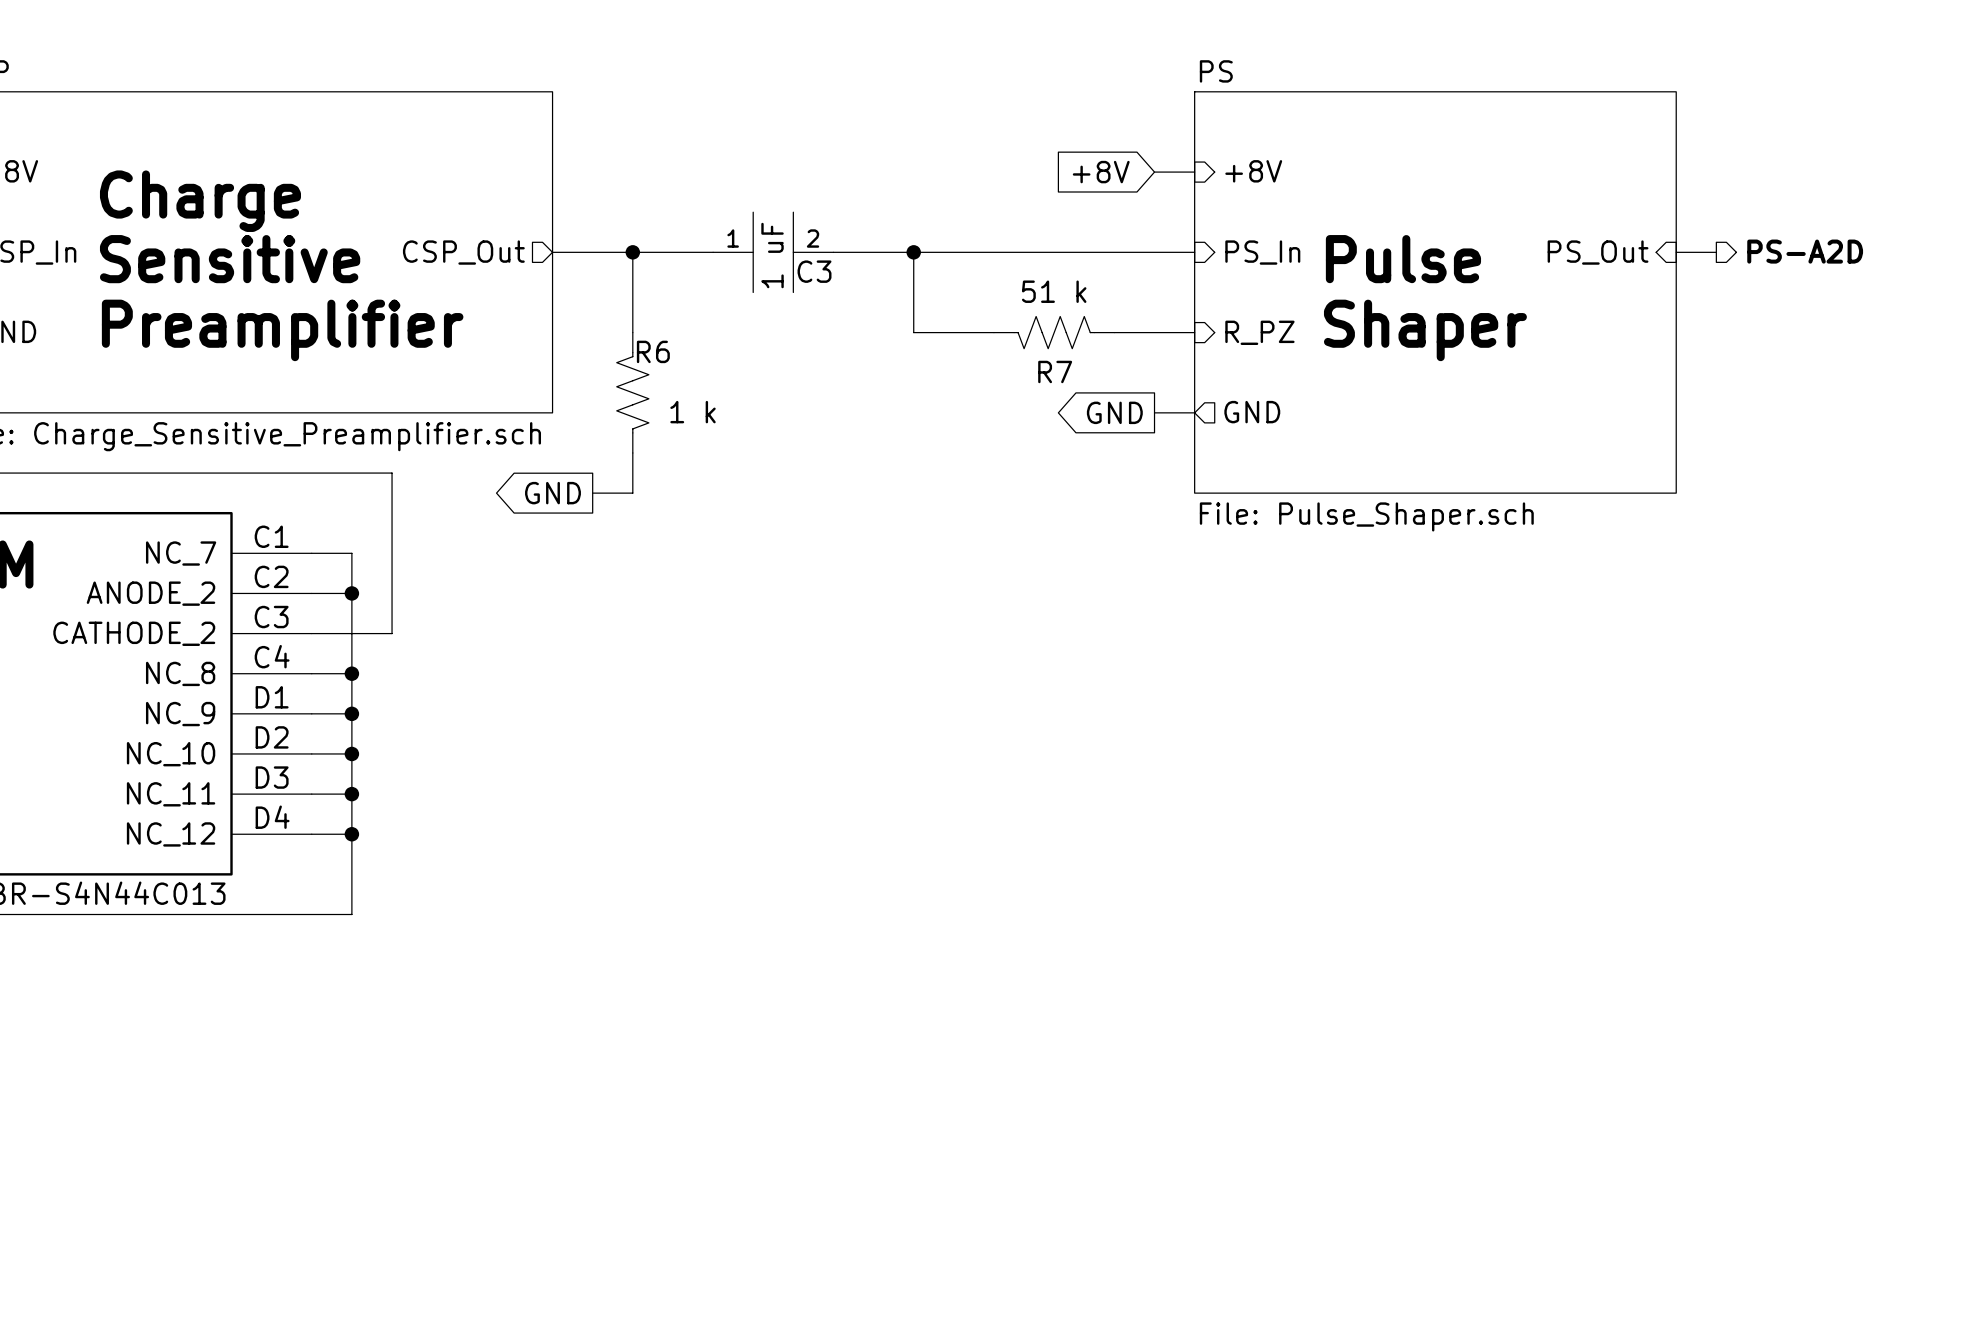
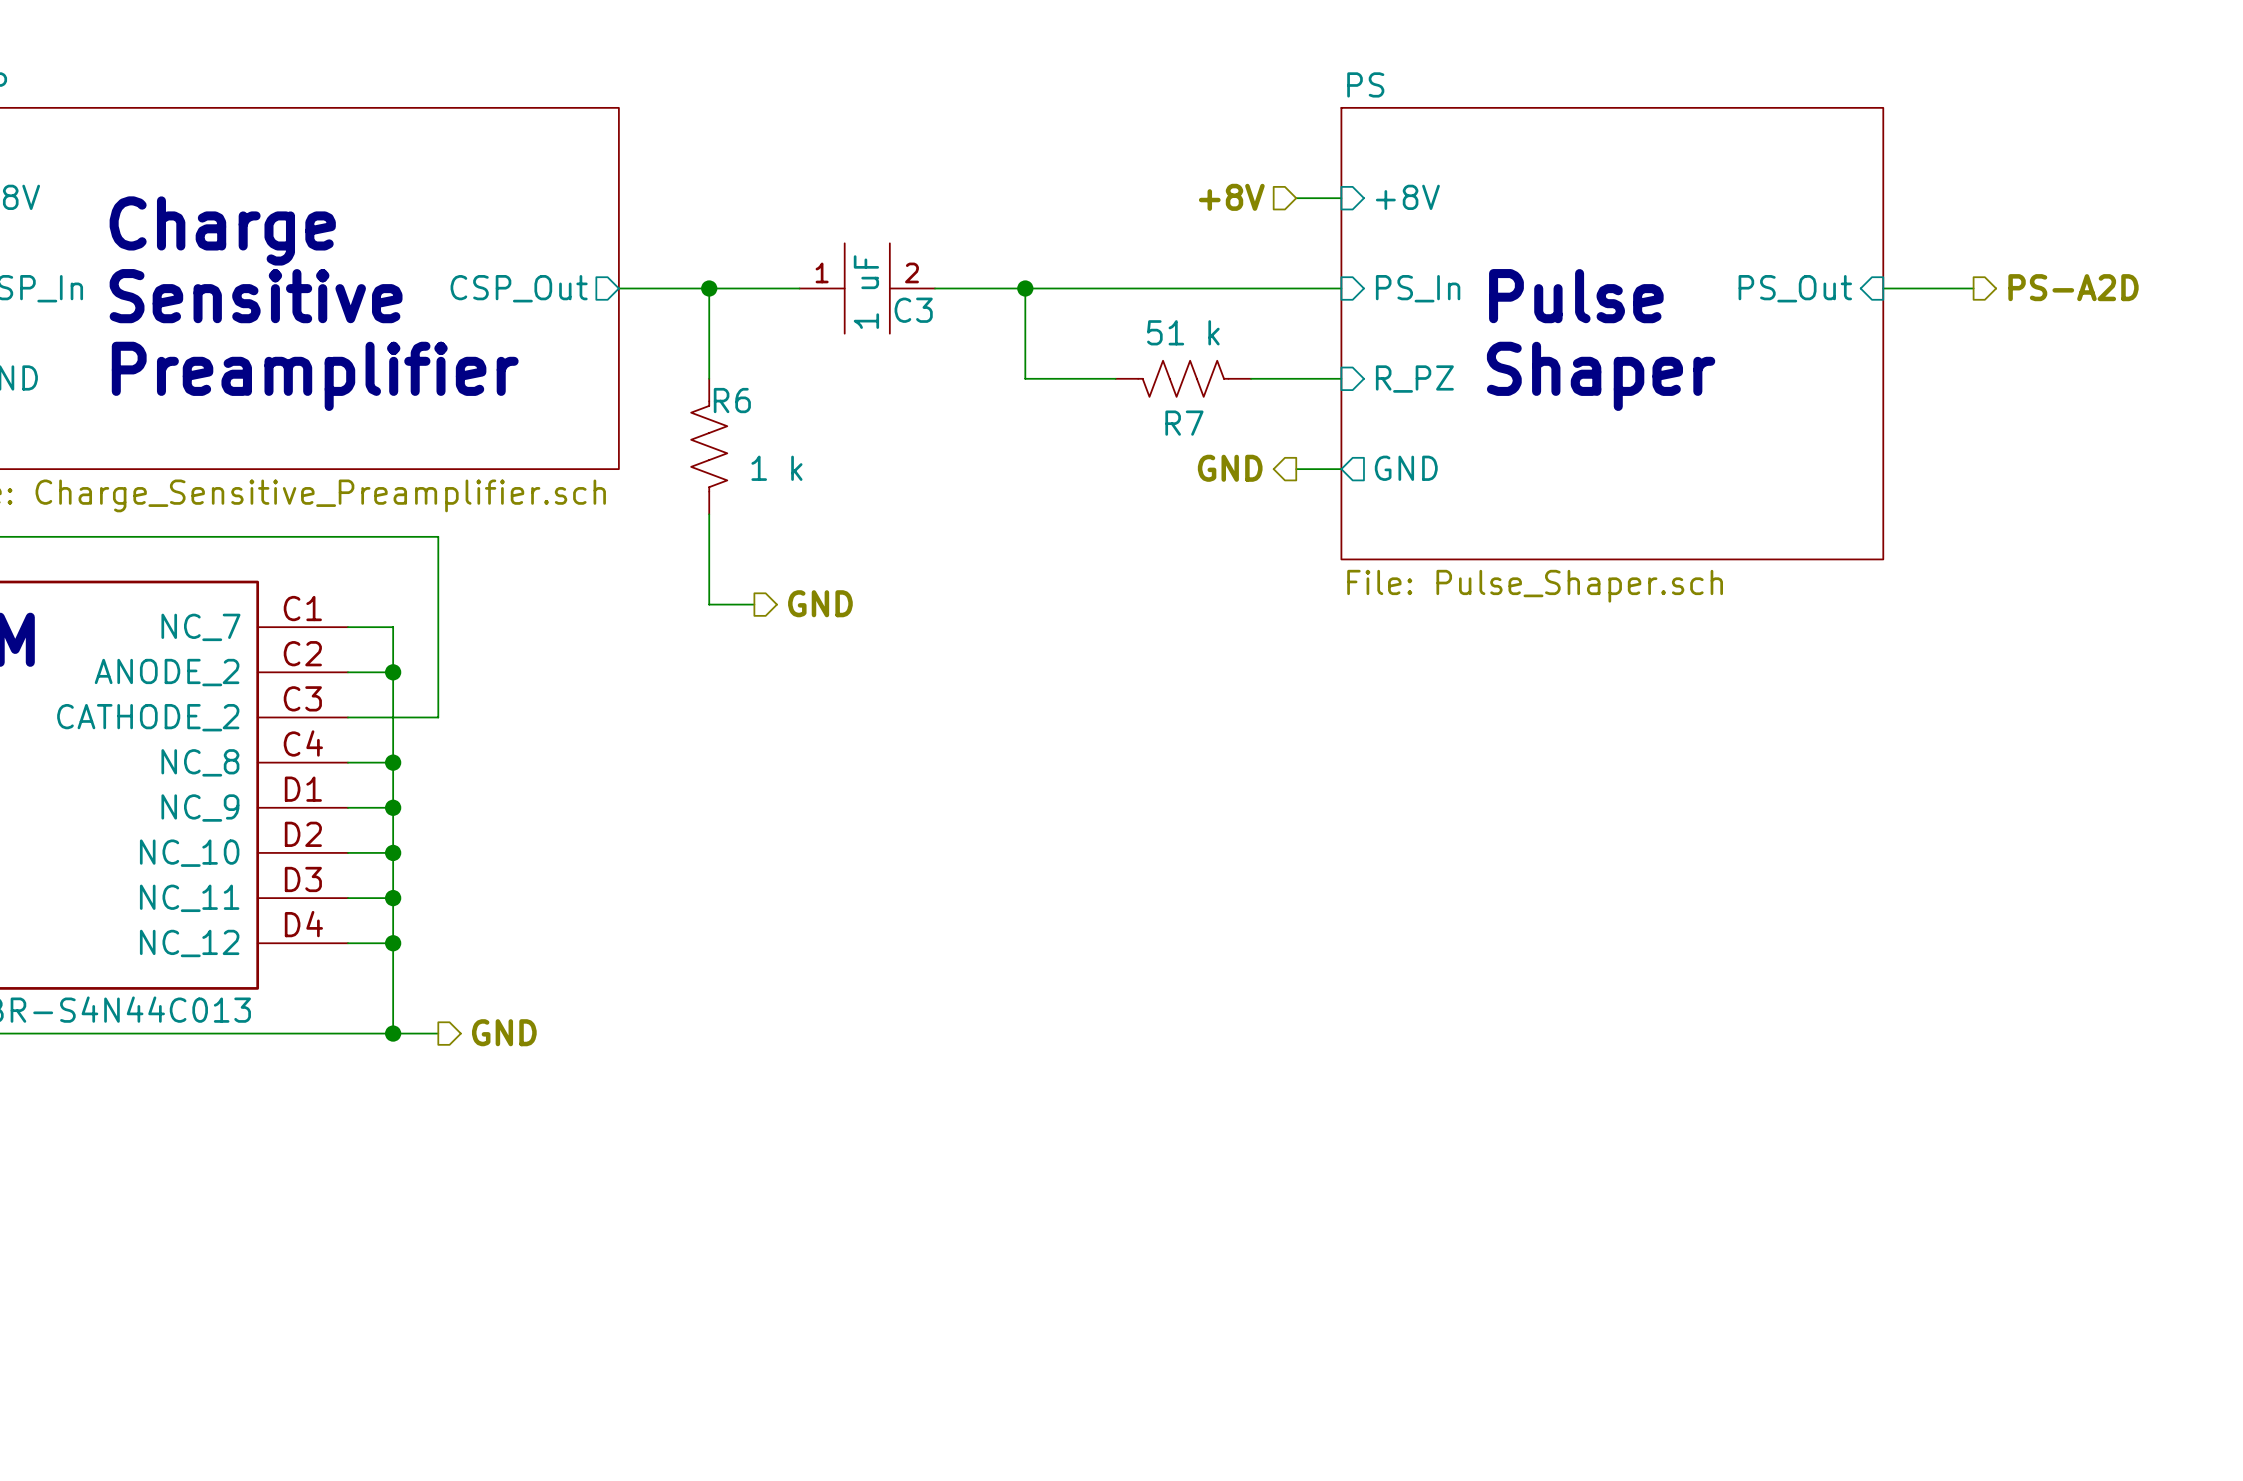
hierarchical label: none -> +8V (1231, 197)
global label: +8V (1101, 172) -> none
hierarchical label position: PS-A2D (1805, 251) -> PS-A2D (2073, 287)
wire: none -> (1928, 288) (1973, 288)
hierarchical label: none -> GND (1230, 468)
global label: GND (1114, 412) -> none
global label: GND (553, 493) -> none
wire: (592, 493) (632, 493) -> (754, 604) (709, 604) (709, 559)
hierarchical label: none -> GND (820, 603)
hierarchical label: none -> GND (504, 1032)
wire: none -> (393, 1033) (438, 1033)
junction: none -> (393, 1033)

